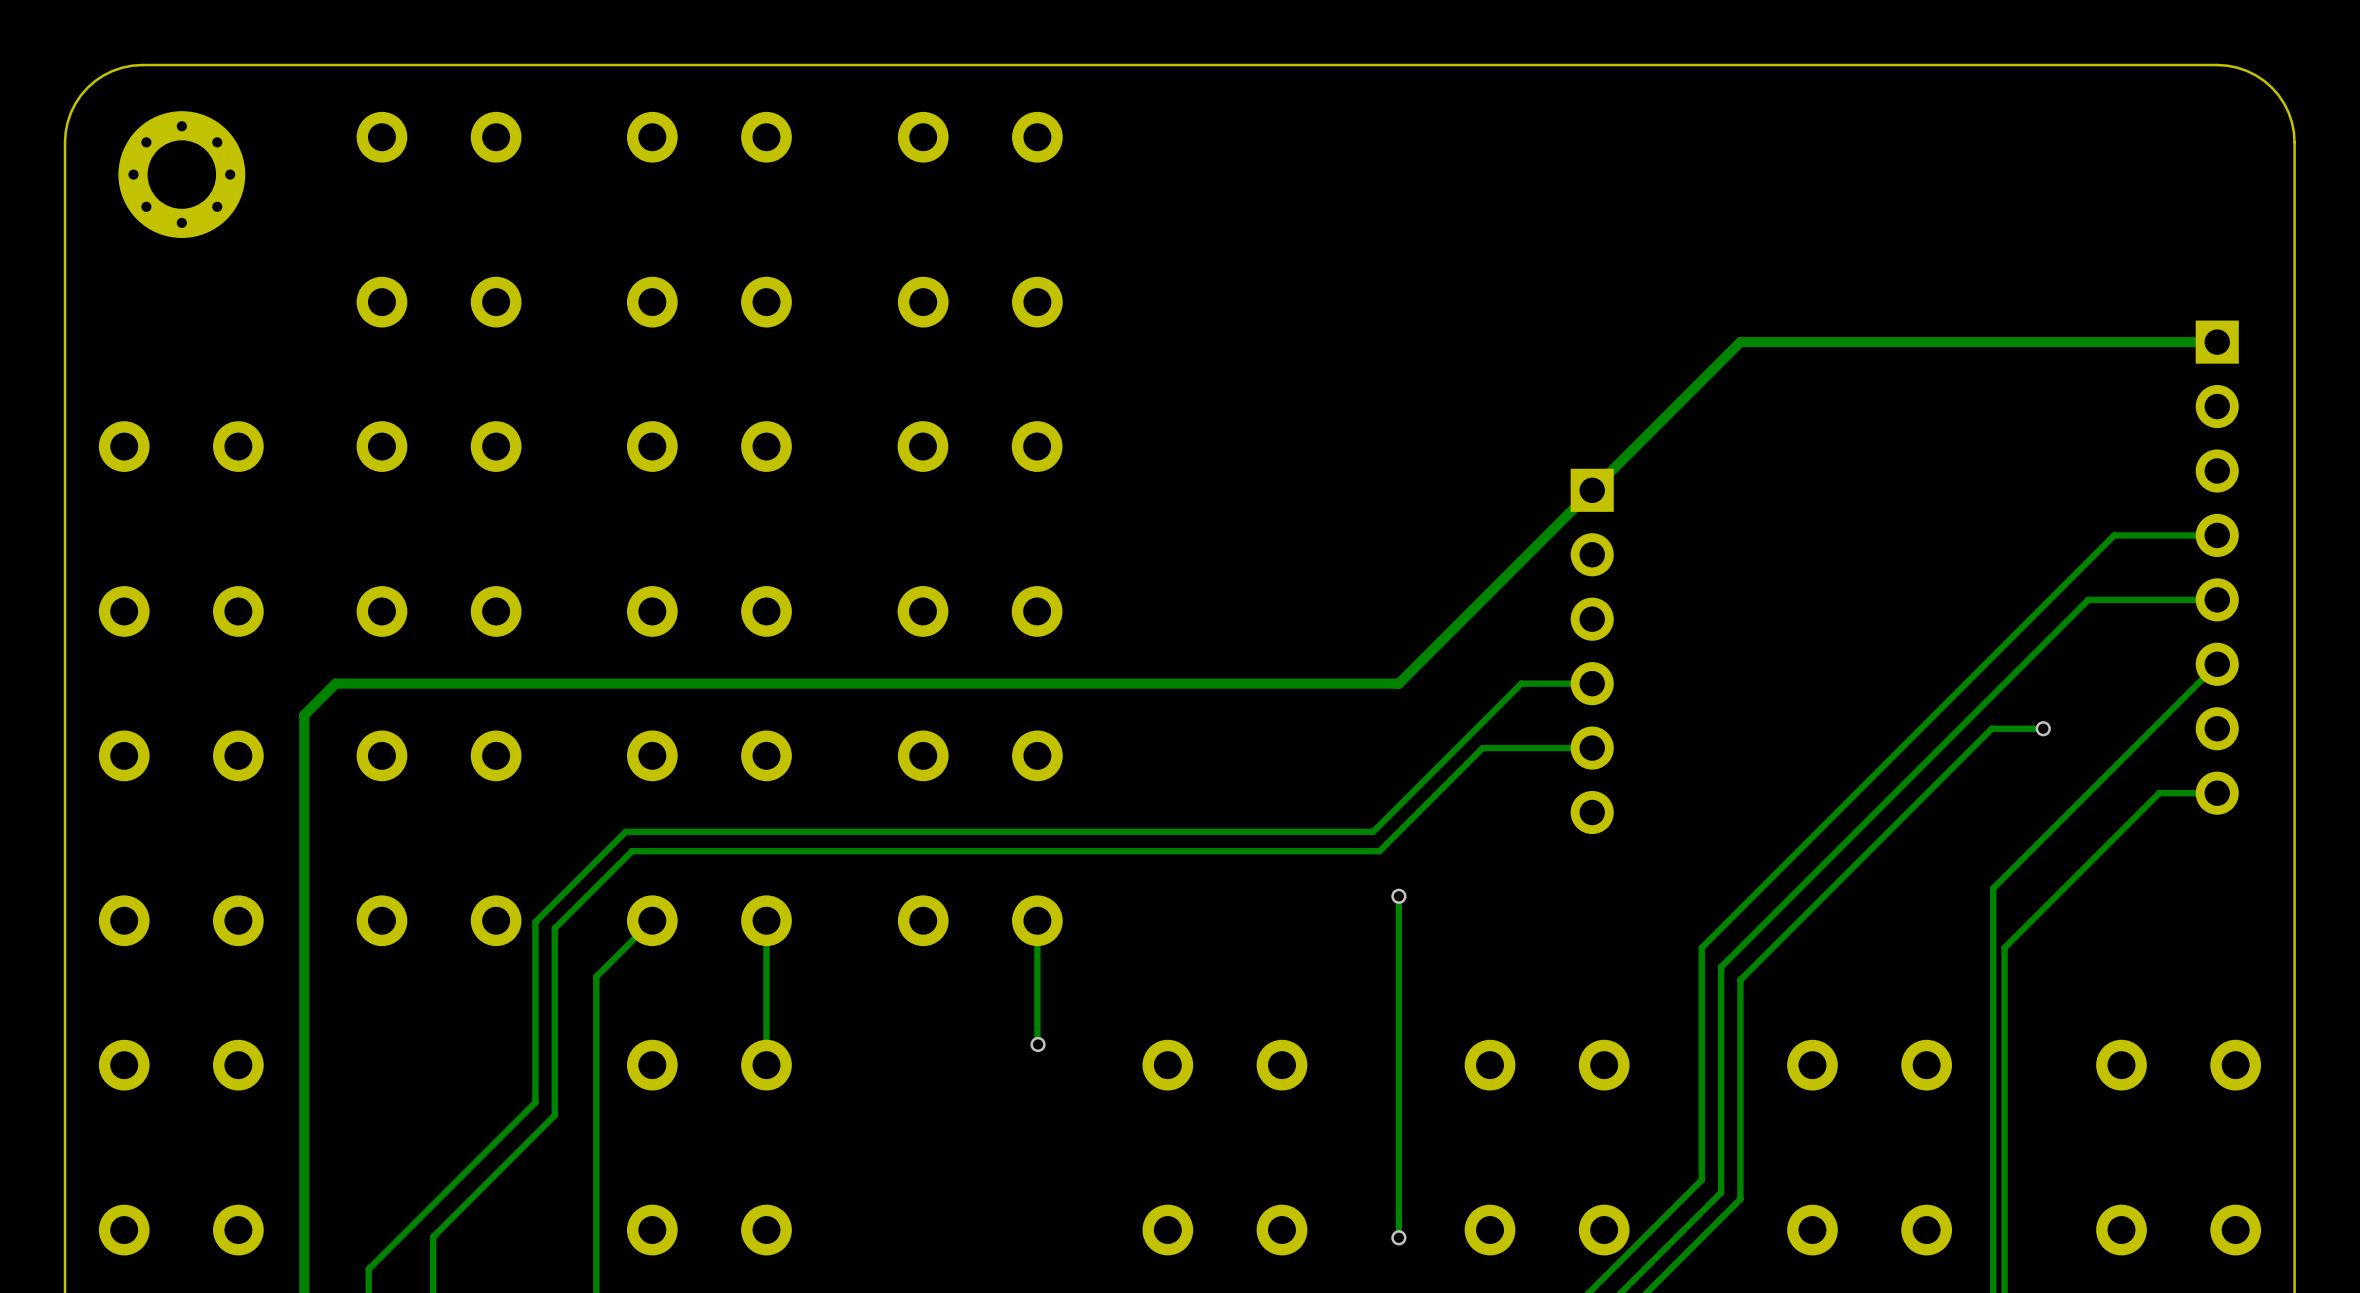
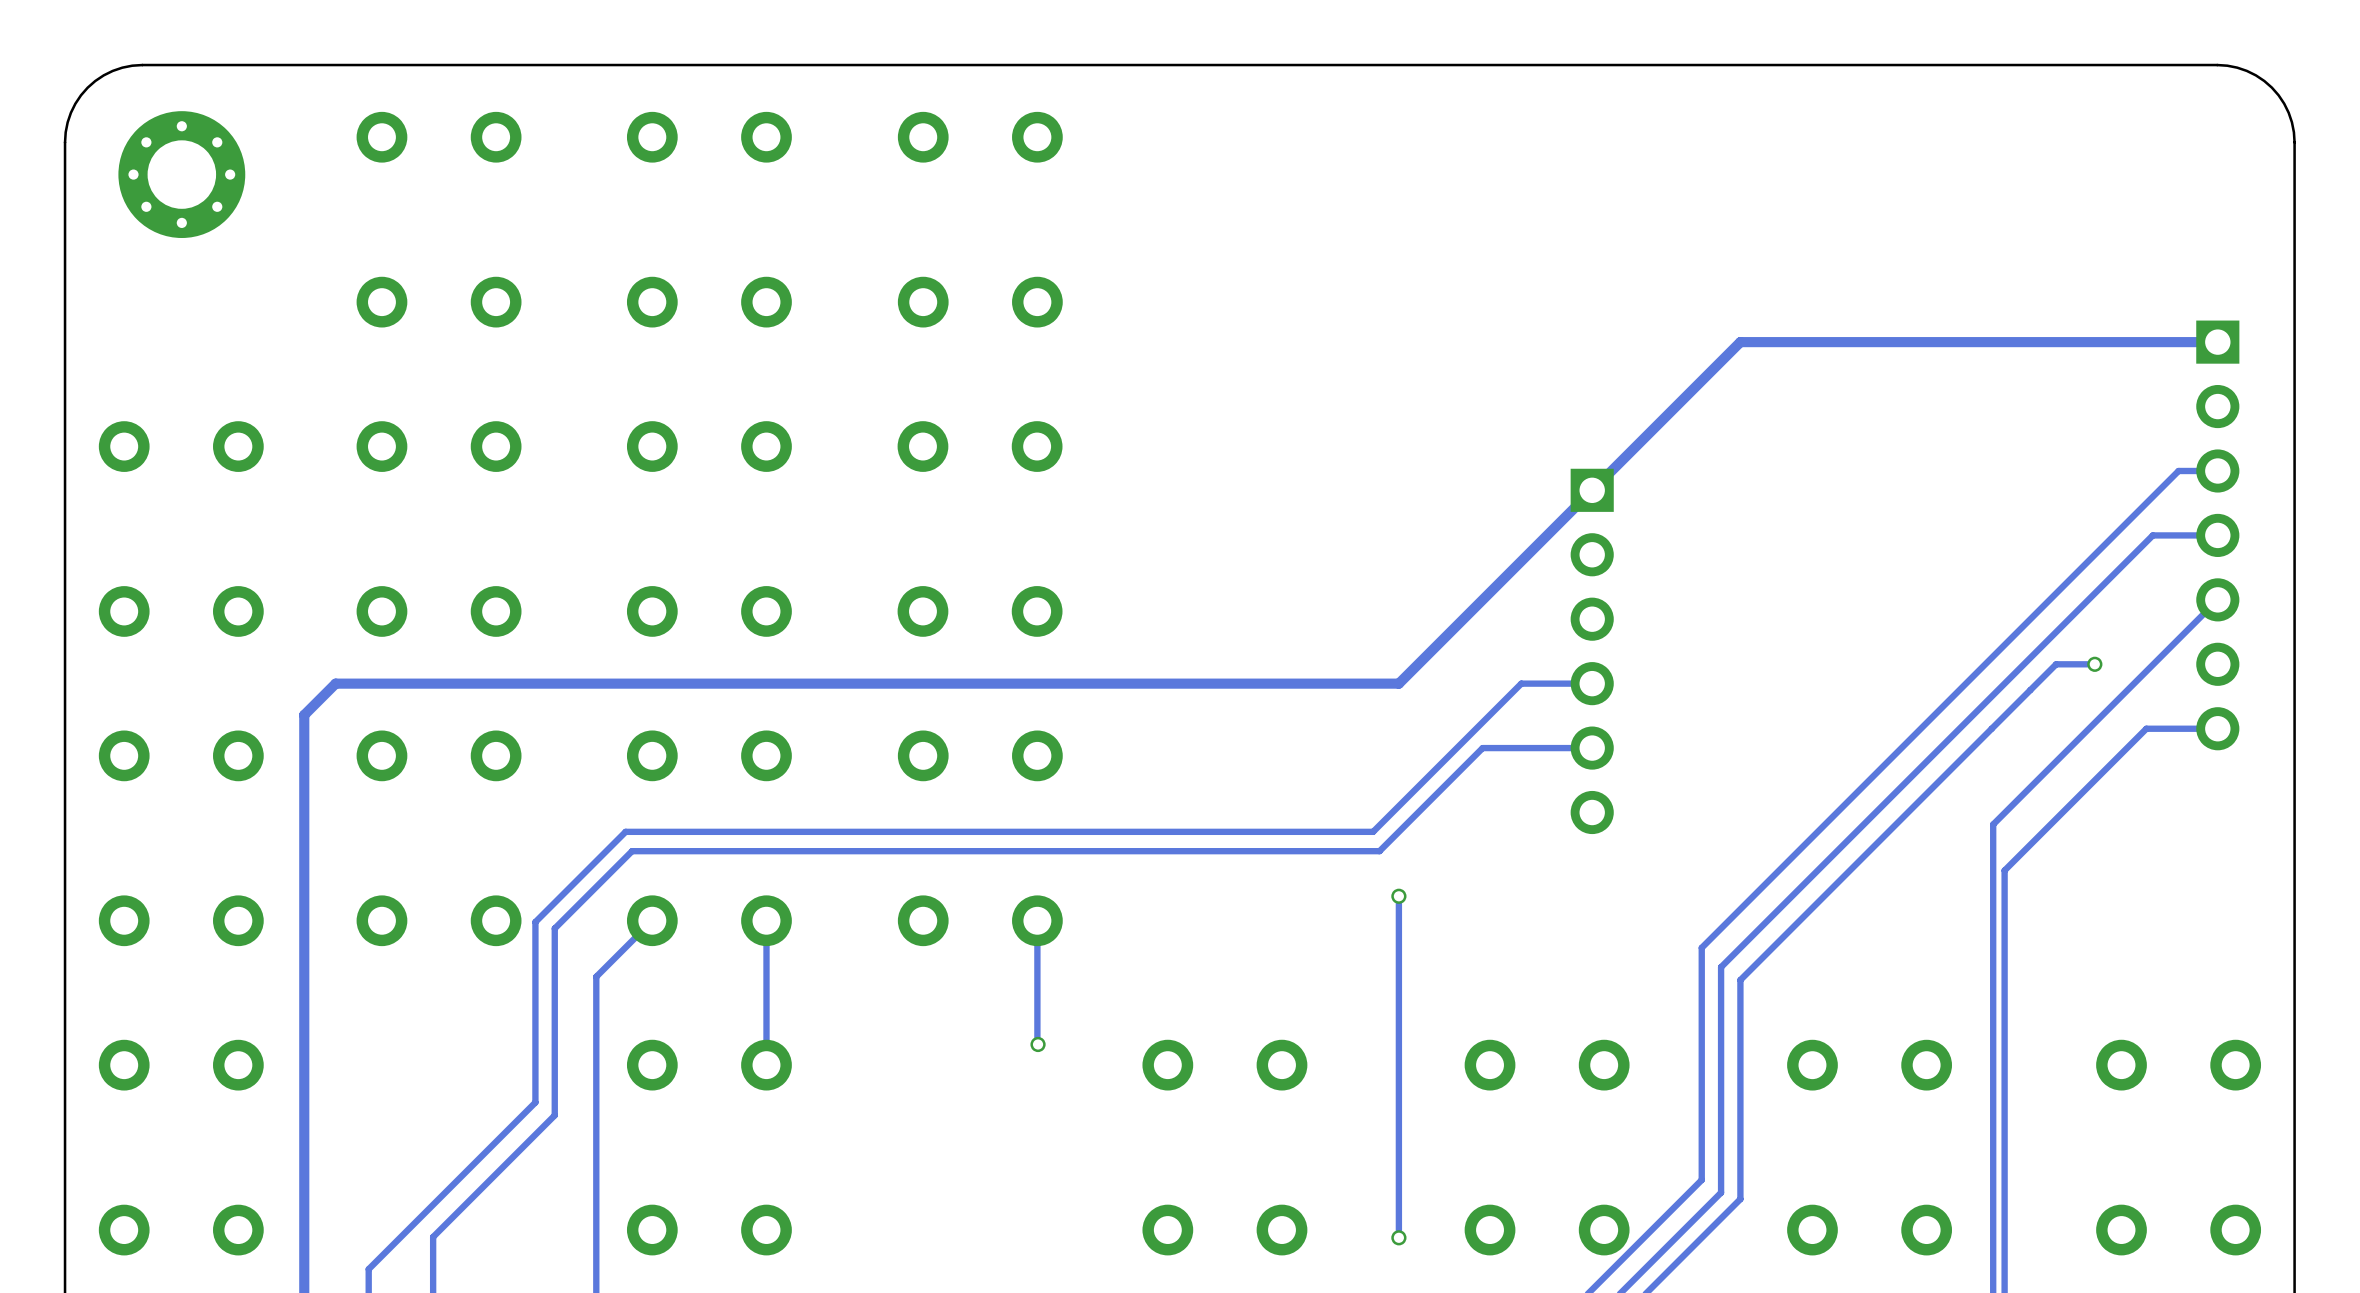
track: none -> (2217, 470) (2178, 470) (2114, 535)
track: (2152, 535) (2114, 535) -> (2152, 535) (2088, 599)
part: none -> (2217, 535)
part: (2217, 567) -> none
track: (2217, 599) (2088, 599) -> none
track: (2217, 664) (1993, 888) -> (2217, 599) (1993, 824) (1993, 888)
track: (2043, 728) (1991, 728) -> (2094, 664) (2056, 664) (1991, 728)
via position: (2043, 728) -> (2094, 664)
track: (2217, 793) (2159, 793) (2004, 947) -> (2217, 728) (2146, 728) (2004, 870) (2004, 947)

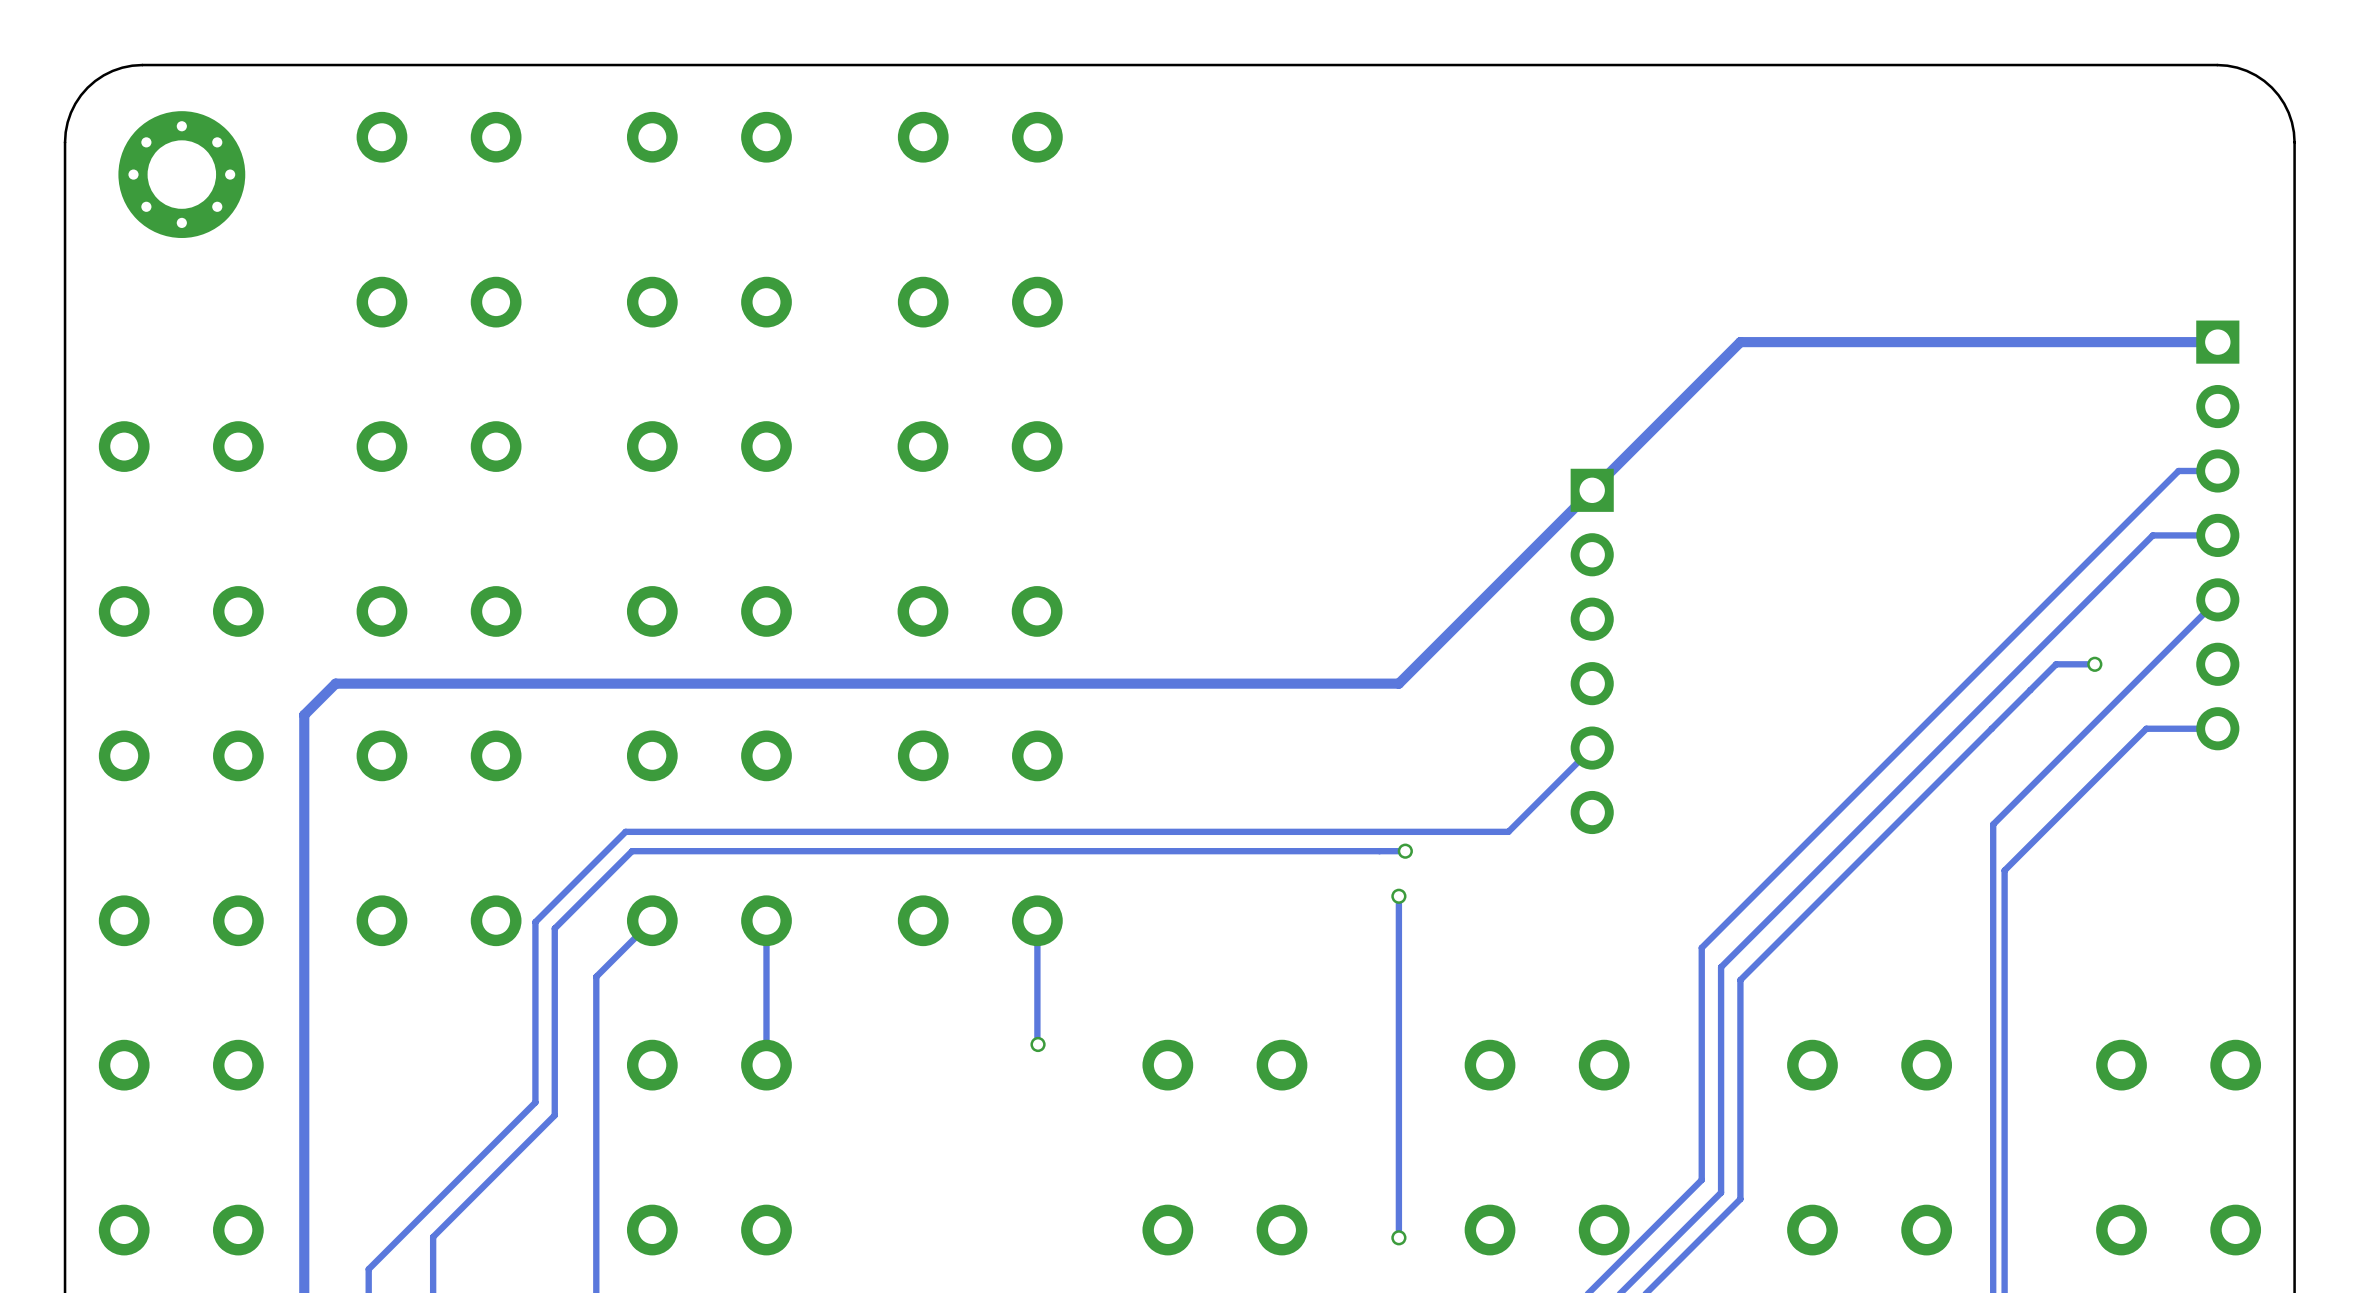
track: (1592, 683) (1521, 683) (1373, 831) -> none
track: (1592, 748) (1482, 748) (1379, 851) -> (1592, 748) (1508, 831) (1373, 831)
track: none -> (1405, 851) (1379, 851)
via: none -> (1405, 851)

